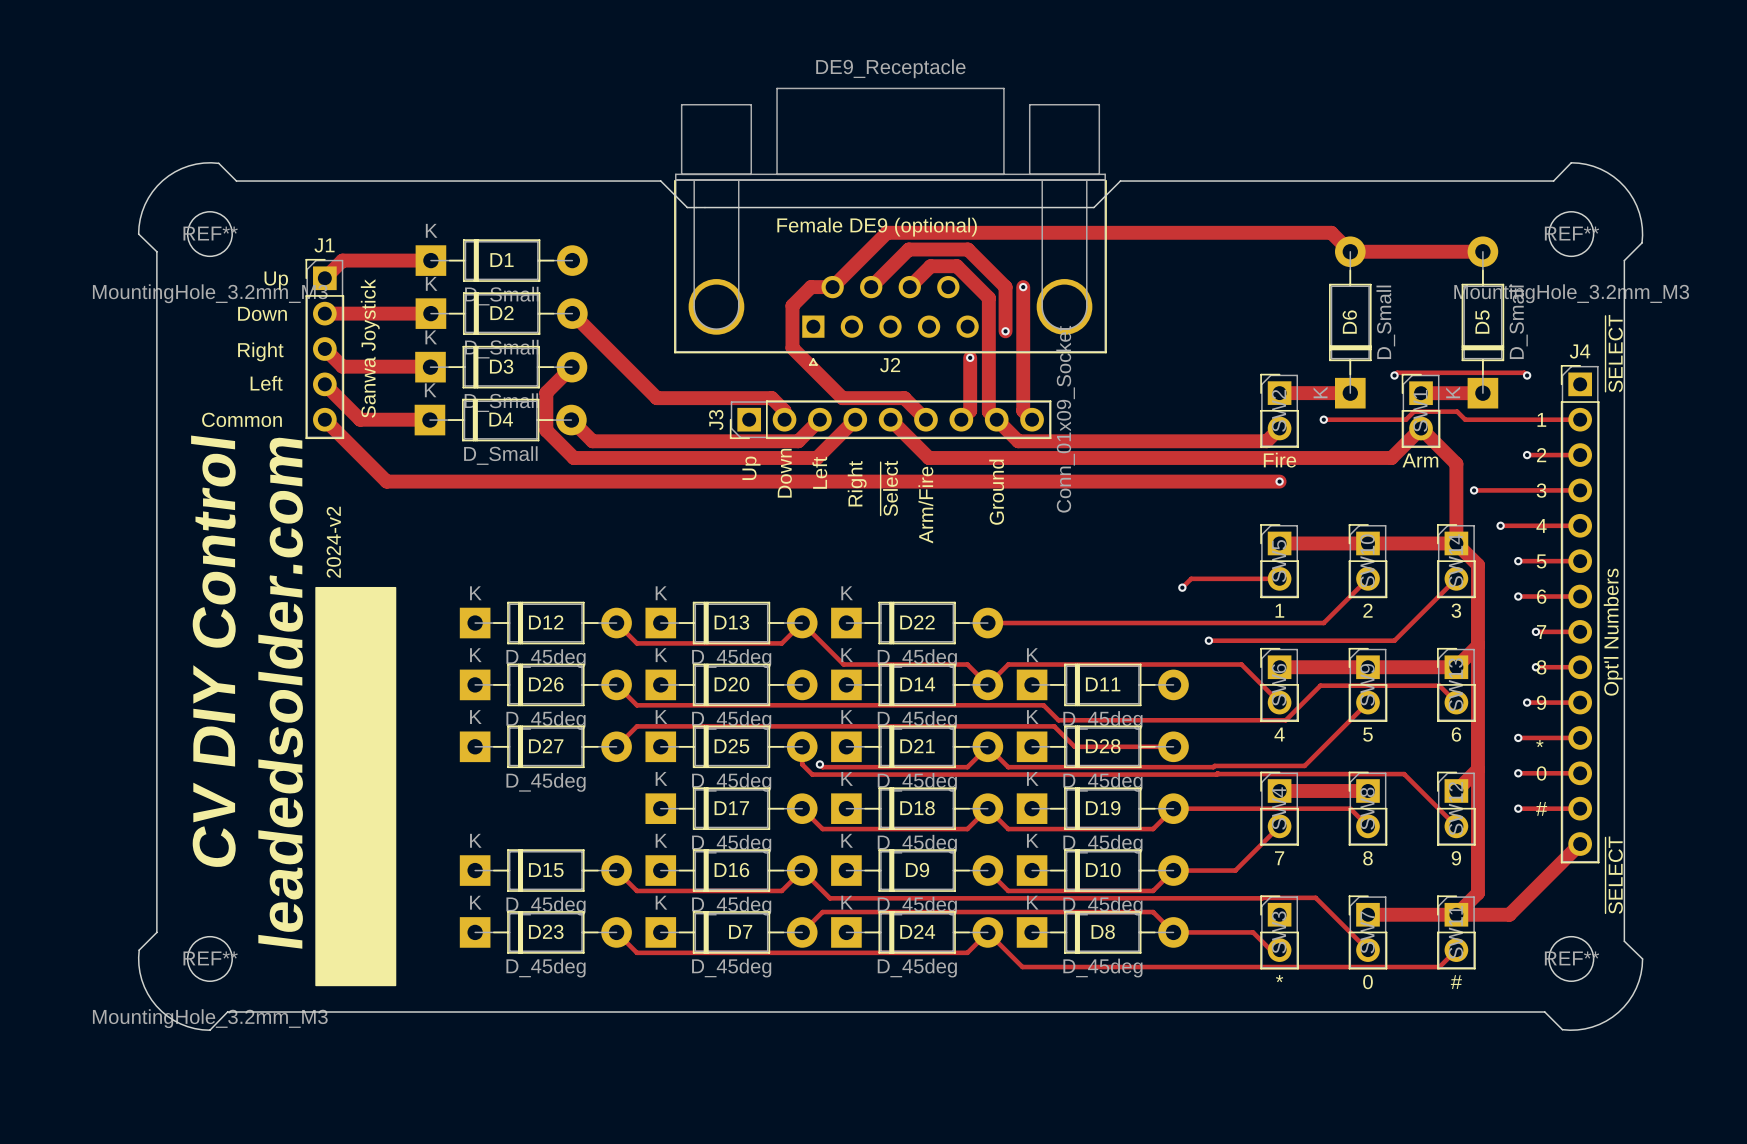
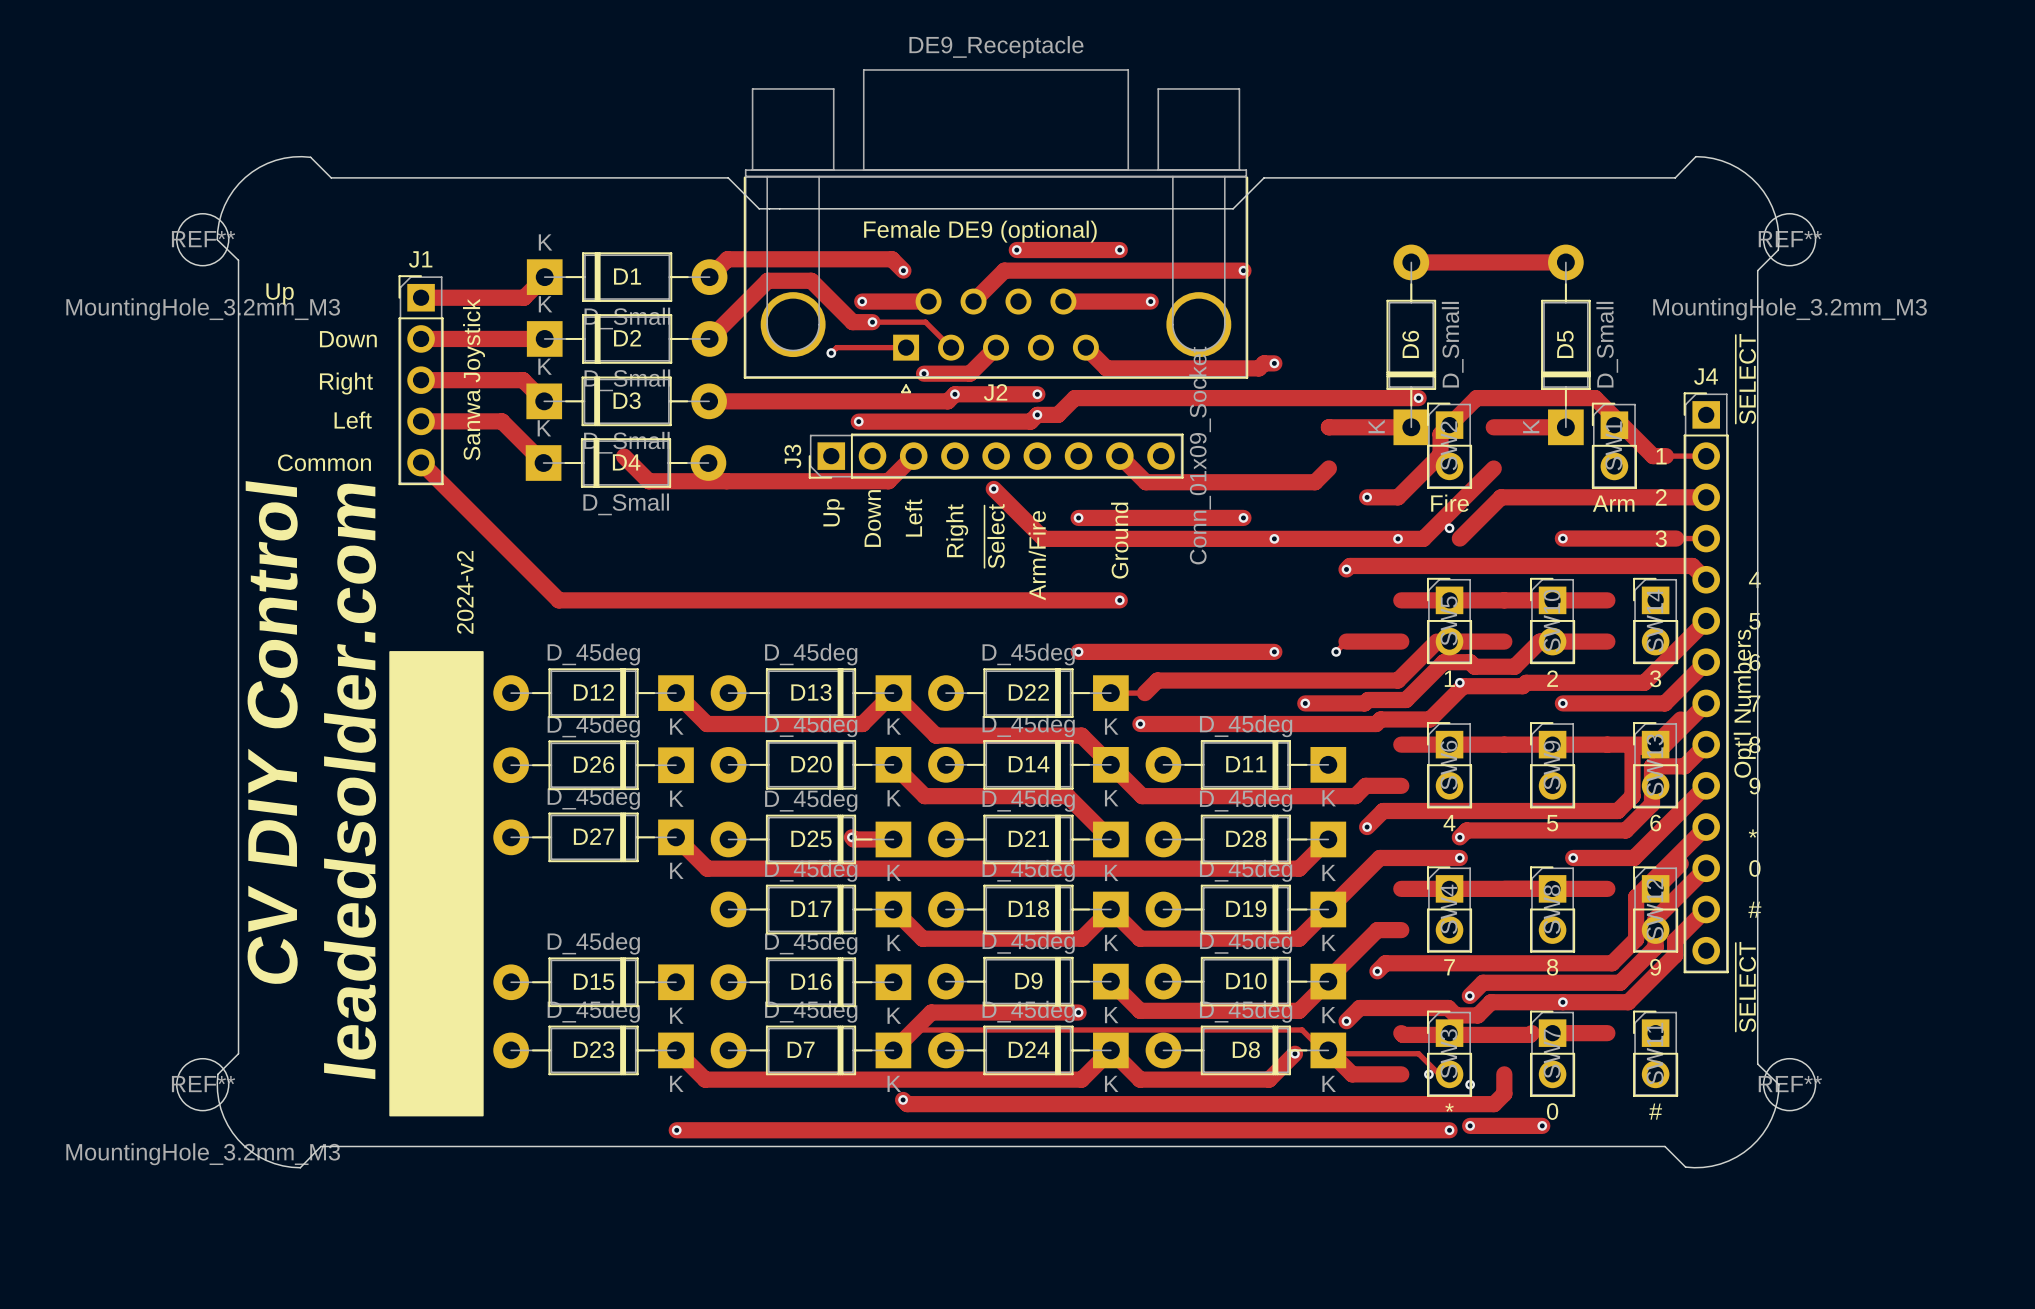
board edge: (320, 181) (236, 181) (218, 163) (203, 163) (188, 165) (168, 175) (152, 191) (142, 211) (138, 234) (156, 251) (156, 932) (139, 950) (139, 972) (147, 993) (161, 1011) (180, 1023) (194, 1028) (209, 1030) (227, 1012) (311, 1012) -> (331, 177) (310, 157) (284, 158) (259, 167) (245, 177) (228, 197) (219, 222) (217, 239) (238, 260) (238, 1053) (217, 1074) (217, 1091) (220, 1109) (232, 1132) (244, 1145) (258, 1156) (274, 1163) (300, 1167) (320, 1146)
board edge: (1473, 181) (1553, 181) (1571, 162) (1586, 164) (1607, 172) (1624, 186) (1636, 205) (1641, 220) (1642, 242) (1624, 260) (1624, 941) (1642, 958) (1639, 981) (1628, 1001) (1612, 1017) (1592, 1027) (1577, 1029) (1562, 1029) (1544, 1012) (1464, 1012) -> (1675, 177) (1695, 156) (1713, 158) (1737, 168) (1752, 178) (1763, 191) (1772, 206) (1778, 232) (1778, 250) (1757, 270) (1757, 1064) (1778, 1084) (1777, 1102) (1767, 1126) (1750, 1146) (1736, 1157) (1711, 1166) (1685, 1167) (1664, 1146)
track: none -> (1016, 250) (1119, 250)
via: none -> (1016, 250)
via: none -> (1119, 250)
track: (1482, 251) (1350, 251) (1331, 232) (886, 232) (832, 287) -> none
track: none -> (1411, 262) (1565, 262)
track: (430, 260) (342, 260) (324, 278) -> none
D1 position: (501, 260) -> (627, 277)
track: none -> (903, 270) (892, 259) (727, 259) (709, 277)
via: none -> (903, 270)
track: (897, 260) (908, 249) (967, 249) (1005, 287) (1005, 331) -> (1004, 270) (1243, 270)
via: none -> (1243, 270)
track: none -> (544, 277) (524, 297) (421, 297)
via: none -> (862, 301)
track: (811, 287) (792, 305) (792, 348) (842, 398) (904, 398) (925, 419) -> (903, 301) (862, 301)
track: (909, 287) (930, 266) (956, 266) (988, 298) (988, 411) (996, 419) -> none
track: (1023, 287) (1023, 410) (1032, 419) -> (1150, 301) (1063, 301)
via: none -> (872, 322)
text position: Down (262, 313) -> Down (348, 339)
track: (324, 313) (430, 313) -> (421, 338) (544, 338)
D2 position: (501, 313) -> (627, 338)
track: (572, 313) (656, 398) (771, 398) (784, 410) (784, 419) -> none
track: none -> (709, 338) (767, 280) (811, 280) (852, 322) (925, 322) (951, 347)
D6 position: (1350, 322) -> (1411, 344)
D5 position: (1482, 322) -> (1565, 344)
track: none -> (906, 347) (836, 347) (831, 353)
track: none -> (995, 347) (969, 373) (924, 373)
track: none -> (1085, 347) (1106, 368) (1259, 368) (1264, 363) (1274, 363)
via: none -> (831, 353)
via: (1005, 331) -> none
via: none -> (1274, 363)
track: (324, 348) (342, 366) (430, 366) -> none
J1 position: (324, 348) -> (421, 380)
via: none -> (924, 373)
text position: Right (260, 351) -> Right (346, 383)
text position: ~{SELECT} (1614, 353) -> ~{SELECT} (1745, 379)
track: none -> (421, 380) (523, 380) (544, 401)
track: (970, 357) (970, 410) (961, 419) -> none
via: (970, 357) -> none
via: none -> (954, 394)
track: none -> (1037, 394) (954, 394) (947, 401) (709, 401)
via: none -> (1037, 394)
D3 position: (501, 367) -> (626, 401)
track: (571, 367) (546, 392) (546, 430) (573, 457) (816, 457) (855, 419) -> none
track: none -> (1418, 398) (1074, 398) (1057, 414) (1037, 414) (1030, 421) (858, 421)
via: none -> (1418, 398)
track: (1394, 375) (1397, 372) (1524, 372) (1527, 375) -> none
via: (1394, 375) -> none
via: (1527, 375) -> none
text position: Left (266, 383) -> Left (353, 420)
track: (324, 384) (360, 419) (430, 419) -> none
via: none -> (1037, 414)
track: none -> (421, 421) (501, 421) (543, 463)
via: none -> (858, 421)
track: (1279, 393) (1350, 393) -> (1328, 427) (1411, 427)
track: (1421, 393) (1482, 393) -> (1493, 427) (1565, 427)
text position: Common (241, 419) -> Common (324, 462)
track: (324, 419) (386, 481) (1279, 481) -> none
track: (890, 419) (928, 457) (1391, 457) (1421, 428) (1456, 463) (1456, 543) -> none
track: (1323, 419) (1405, 419) (1414, 411) (1457, 411) (1465, 419) -> (1367, 497) (1398, 497) (1440, 454) (1440, 434) (1476, 398) (1595, 398) (1653, 456) (1665, 456)
via: (1323, 419) -> none
track: (1499, 419) (1580, 419) -> none
text position: 1 (1541, 419) -> 1 (1661, 456)
D4 position: (500, 420) -> (626, 463)
track: none -> (421, 462) (558, 600) (1119, 600)
track: (1279, 428) (1266, 441) (1018, 441) -> (1328, 468) (1315, 482) (1144, 481)
track: none -> (1493, 468) (1423, 538) (1043, 538) (993, 488)
via: none -> (993, 488)
via: none -> (1367, 497)
track: none -> (1706, 497) (1501, 497) (1459, 538)
track: (1527, 455) (1580, 455) -> none
via: (1527, 455) -> none
text position: 2 (1541, 455) -> 2 (1661, 497)
track: none -> (1078, 517) (1243, 517)
via: none -> (1078, 517)
via: none -> (1243, 517)
via: none -> (1274, 538)
via: none -> (1398, 538)
track: none -> (1562, 538) (1676, 538)
via: none -> (1562, 538)
via: (1474, 490) -> none
track: (1499, 490) (1580, 490) -> none
text position: 3 (1541, 490) -> 3 (1661, 538)
track: none -> (1346, 569) (1349, 565) (1692, 565) (1706, 579)
via: none -> (1346, 569)
track: (1500, 525) (1580, 525) -> none
via: (1500, 525) -> none
text position: 2024-v2 (333, 542) -> 2024-v2 (465, 592)
via: none -> (1119, 600)
track: (1415, 543) (1456, 543) -> (1401, 600) (1449, 600)
track: (1456, 543) (1477, 565) (1477, 893) (1456, 914) -> none
track: none -> (1706, 620) (1644, 682) (1526, 682) (1522, 686) (1463, 686) (1429, 719) (1380, 719) (1376, 724) (1140, 724)
track: (1518, 561) (1580, 561) -> none
via: (1518, 561) -> none
track width: thin (1191, 578) (1238, 578) -> thick (1346, 641) (1401, 641)
track: (1238, 578) (1268, 578) -> none
track: none -> (1449, 641) (1504, 641)
track: (1367, 578) (1323, 623) (1018, 623) -> (1436, 641) (1397, 680) (1157, 680) (1144, 693)
track: none -> (1607, 641) (1539, 641) (1514, 666) (1474, 666) (1470, 662) (1443, 662) (1405, 700) (1368, 700) (1364, 703) (1305, 703)
track: (1456, 578) (1394, 640) (1208, 640) -> none
track: none -> (1078, 651) (1274, 651)
via: none -> (1078, 651)
via: none -> (1274, 651)
track: none -> (1706, 662) (1664, 703) (1562, 703)
track: (1518, 596) (1580, 596) -> none
via: (1518, 596) -> none
via: none -> (1459, 682)
J4 position: (1580, 614) -> (1706, 682)
D12 rotation: 0° (545, 623) -> 180° (593, 693)
track: none -> (676, 693) (706, 724) (862, 724) (893, 693) (935, 735) (1081, 735) (1142, 796) (1355, 796) (1365, 785) (1401, 785)
track: (616, 623) (636, 643) (781, 643) (802, 623) (843, 664) (967, 664) (987, 684) (1008, 664) (1241, 664) (1279, 702) -> none
D13 rotation: 0° (731, 623) -> 180° (811, 693)
D22 rotation: 0° (917, 623) -> 180° (1028, 693)
via: none -> (1305, 703)
via: none -> (1562, 703)
track: none -> (1706, 703) (1662, 746) (1632, 746) (1632, 796) (1617, 811) (1383, 811) (1367, 827)
track: (1535, 631) (1580, 631) -> none
via: (1535, 631) -> none
via: (1208, 640) -> none
via: none -> (1140, 724)
text position: CV DIY Control (213, 651) -> CV DIY Control (271, 733)
track: none -> (1401, 744) (1449, 744)
track: none -> (1706, 744) (1684, 766) (1652, 766) (1652, 804) (1625, 830) (1466, 830) (1459, 837)
track: (1535, 667) (1580, 667) -> none
via: (1535, 667) -> none
D26 rotation: 0° (545, 684) -> 180° (593, 765)
track: (616, 684) (636, 705) (1043, 705) (1058, 720) (1285, 720) (1320, 685) (1439, 685) (1456, 702) -> none
D20 rotation: 0° (731, 684) -> 180° (811, 764)
track: none -> (893, 764) (924, 796) (1067, 796) (1110, 839)
D14 rotation: 0° (917, 684) -> 180° (1028, 764)
D11 rotation: 0° (1102, 684) -> 180° (1245, 764)
text position: leadedsolder.com (280, 692) -> leadedsolder.com (350, 781)
track: (1367, 702) (1304, 765) (1008, 767) (987, 746) (967, 767) (822, 767) (819, 764) -> none
track: none -> (1706, 785) (1634, 857) (1573, 857)
track: (1527, 702) (1580, 702) -> none
via: (1527, 702) -> none
via: none -> (1367, 827)
track: none -> (1706, 827) (1636, 897) (1636, 939) (1612, 963) (1385, 963) (1377, 971)
track: (1518, 737) (1580, 737) -> none
via: (1518, 737) -> none
D27 rotation: 0° (545, 746) -> 180° (593, 837)
track: none -> (676, 837) (707, 868) (1299, 868) (1328, 839)
track: (616, 746) (636, 726) (1054, 726) (1074, 746) (1173, 746) -> none
D25 rotation: 0° (731, 746) -> 180° (811, 839)
track: none -> (851, 837) (854, 839) (893, 839)
track: (802, 746) (802, 764) (812, 774) (1404, 774) (1456, 826) -> none
D21 rotation: 0° (917, 746) -> 180° (1028, 839)
D28 rotation: 0° (1102, 746) -> 180° (1245, 839)
via: none -> (1459, 837)
via position: (819, 764) -> (851, 837)
via: none -> (1459, 857)
via: none -> (1573, 857)
track: none -> (1706, 868) (1655, 918) (1655, 947) (1620, 982) (1483, 982) (1469, 995)
track: (1518, 773) (1580, 773) -> none
via: (1518, 773) -> none
drawing position: (355, 786) -> (436, 883)
track: none -> (1401, 888) (1449, 888)
track: none -> (1552, 888) (1607, 888)
D17 rotation: 0° (731, 808) -> 180° (811, 909)
track: (802, 808) (822, 829) (967, 829) (987, 808) (1008, 829) (1153, 829) (1173, 808) (1350, 808) (1367, 826) -> (893, 909) (922, 938) (1081, 938) (1110, 909) (1140, 938) (1299, 938) (1379, 857) (1459, 857)
D18 rotation: 0° (917, 808) -> 180° (1028, 909)
D19 rotation: 0° (1102, 808) -> 180° (1245, 909)
track: none -> (1706, 909) (1675, 940) (1675, 955) (1628, 1002) (1491, 1002) (1477, 1015) (1455, 1015) (1448, 1007) (1359, 1007) (1346, 1021)
track: (1518, 808) (1580, 808) -> (1470, 1125) (1542, 1125)
via: (1518, 808) -> none
track: none -> (1401, 930) (1377, 930) (1299, 1010) (1140, 1010) (1110, 981)
track: (1279, 826) (1235, 870) (1173, 870) (1153, 890) (1008, 890) (987, 870) -> none
track: (1580, 844) (1509, 914) (1415, 914) -> none
via: none -> (1377, 971)
D15 rotation: 0° (545, 870) -> 180° (593, 982)
track: (616, 870) (636, 890) (781, 890) (802, 870) (829, 898) (1315, 897) (1367, 950) -> none
D16 rotation: 0° (731, 870) -> 180° (811, 982)
D9 rotation: 0° (917, 870) -> 180° (1028, 981)
D10 rotation: 0° (1102, 870) -> 180° (1245, 981)
text position: ~{SELECT} (1614, 875) -> ~{SELECT} (1745, 987)
via: none -> (1469, 995)
via: none -> (1562, 1002)
track: none -> (1078, 1012) (931, 1012) (893, 1050)
via: none -> (1078, 1012)
via: none -> (1346, 1021)
track: none -> (1401, 1033) (1403, 1034) (1530, 1034) (1531, 1033)
track: none -> (676, 1050) (705, 1079) (1081, 1079) (1110, 1050) (1140, 1079) (1269, 1079) (1294, 1053)
track: none -> (1328, 1050) (1352, 1074) (1401, 1074)
D23 rotation: 0° (545, 932) -> 180° (593, 1050)
track: (616, 932) (636, 952) (967, 952) (987, 932) (1022, 967) (1439, 967) (1456, 950) -> none
D7 rotation: 0° (731, 932) -> 180° (811, 1050)
D24 rotation: 0° (917, 932) -> 180° (1028, 1050)
D8 rotation: 0° (1102, 932) -> 180° (1245, 1050)
via: none -> (1294, 1053)
via: none -> (1428, 1074)
track: none -> (1504, 1074) (1504, 1093) (1494, 1104) (907, 1104) (903, 1099)
via: none -> (1470, 1084)
via: none -> (903, 1099)
via: none -> (1470, 1125)
via: none -> (1542, 1125)
track: none -> (676, 1130) (1449, 1130)
via: none -> (676, 1130)
via: none -> (1449, 1130)

